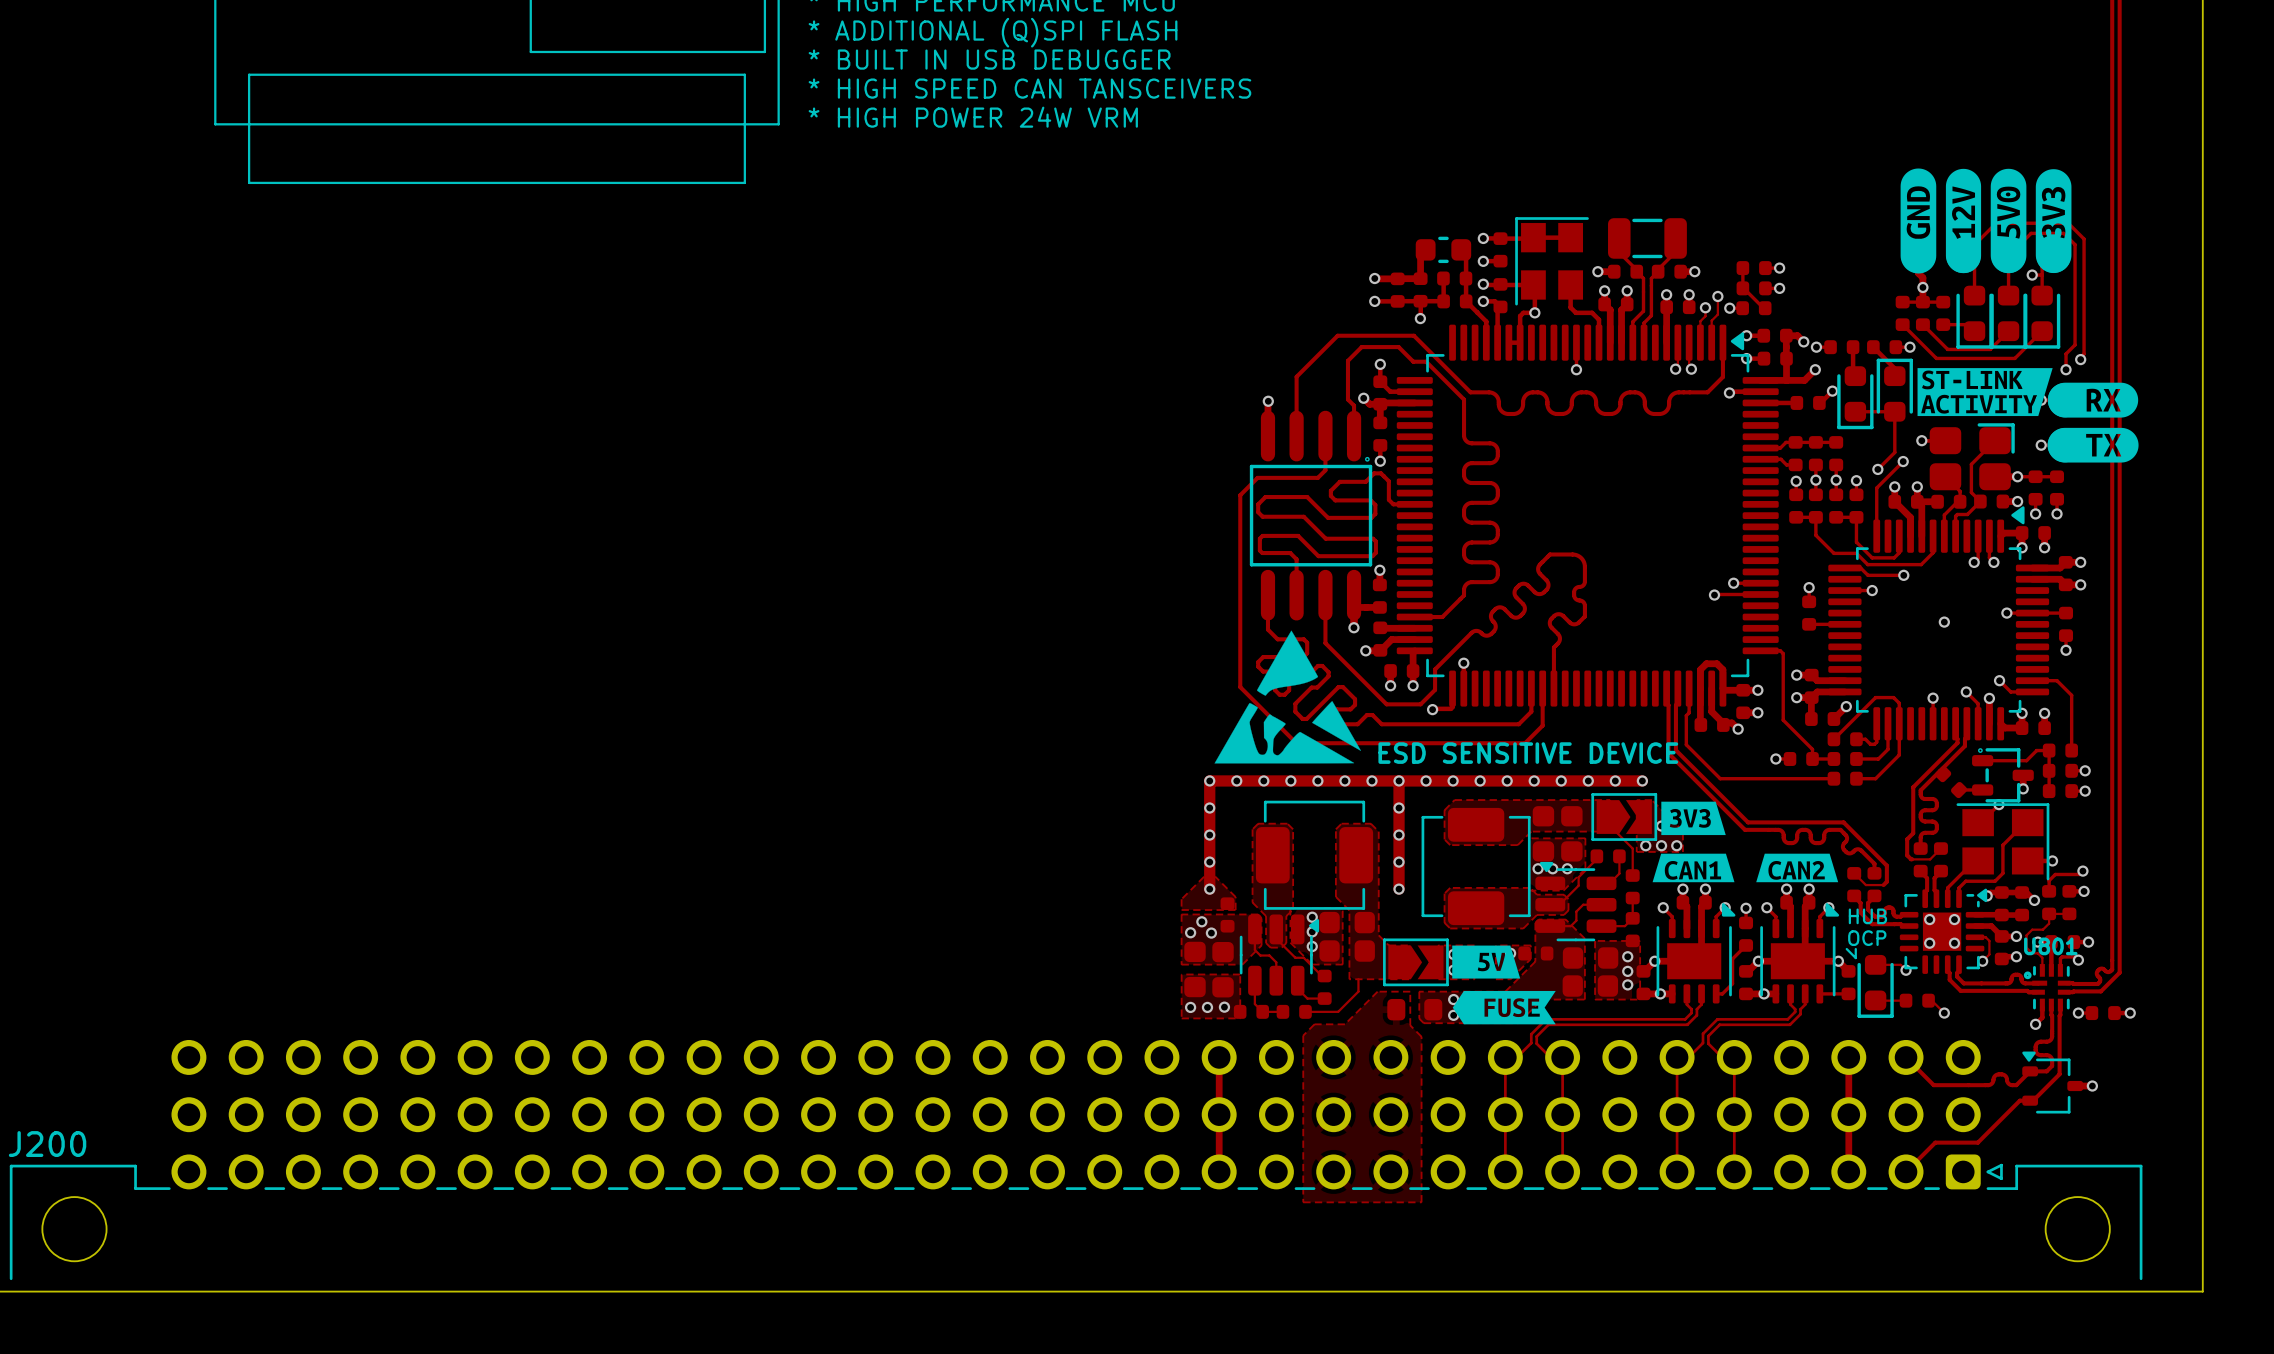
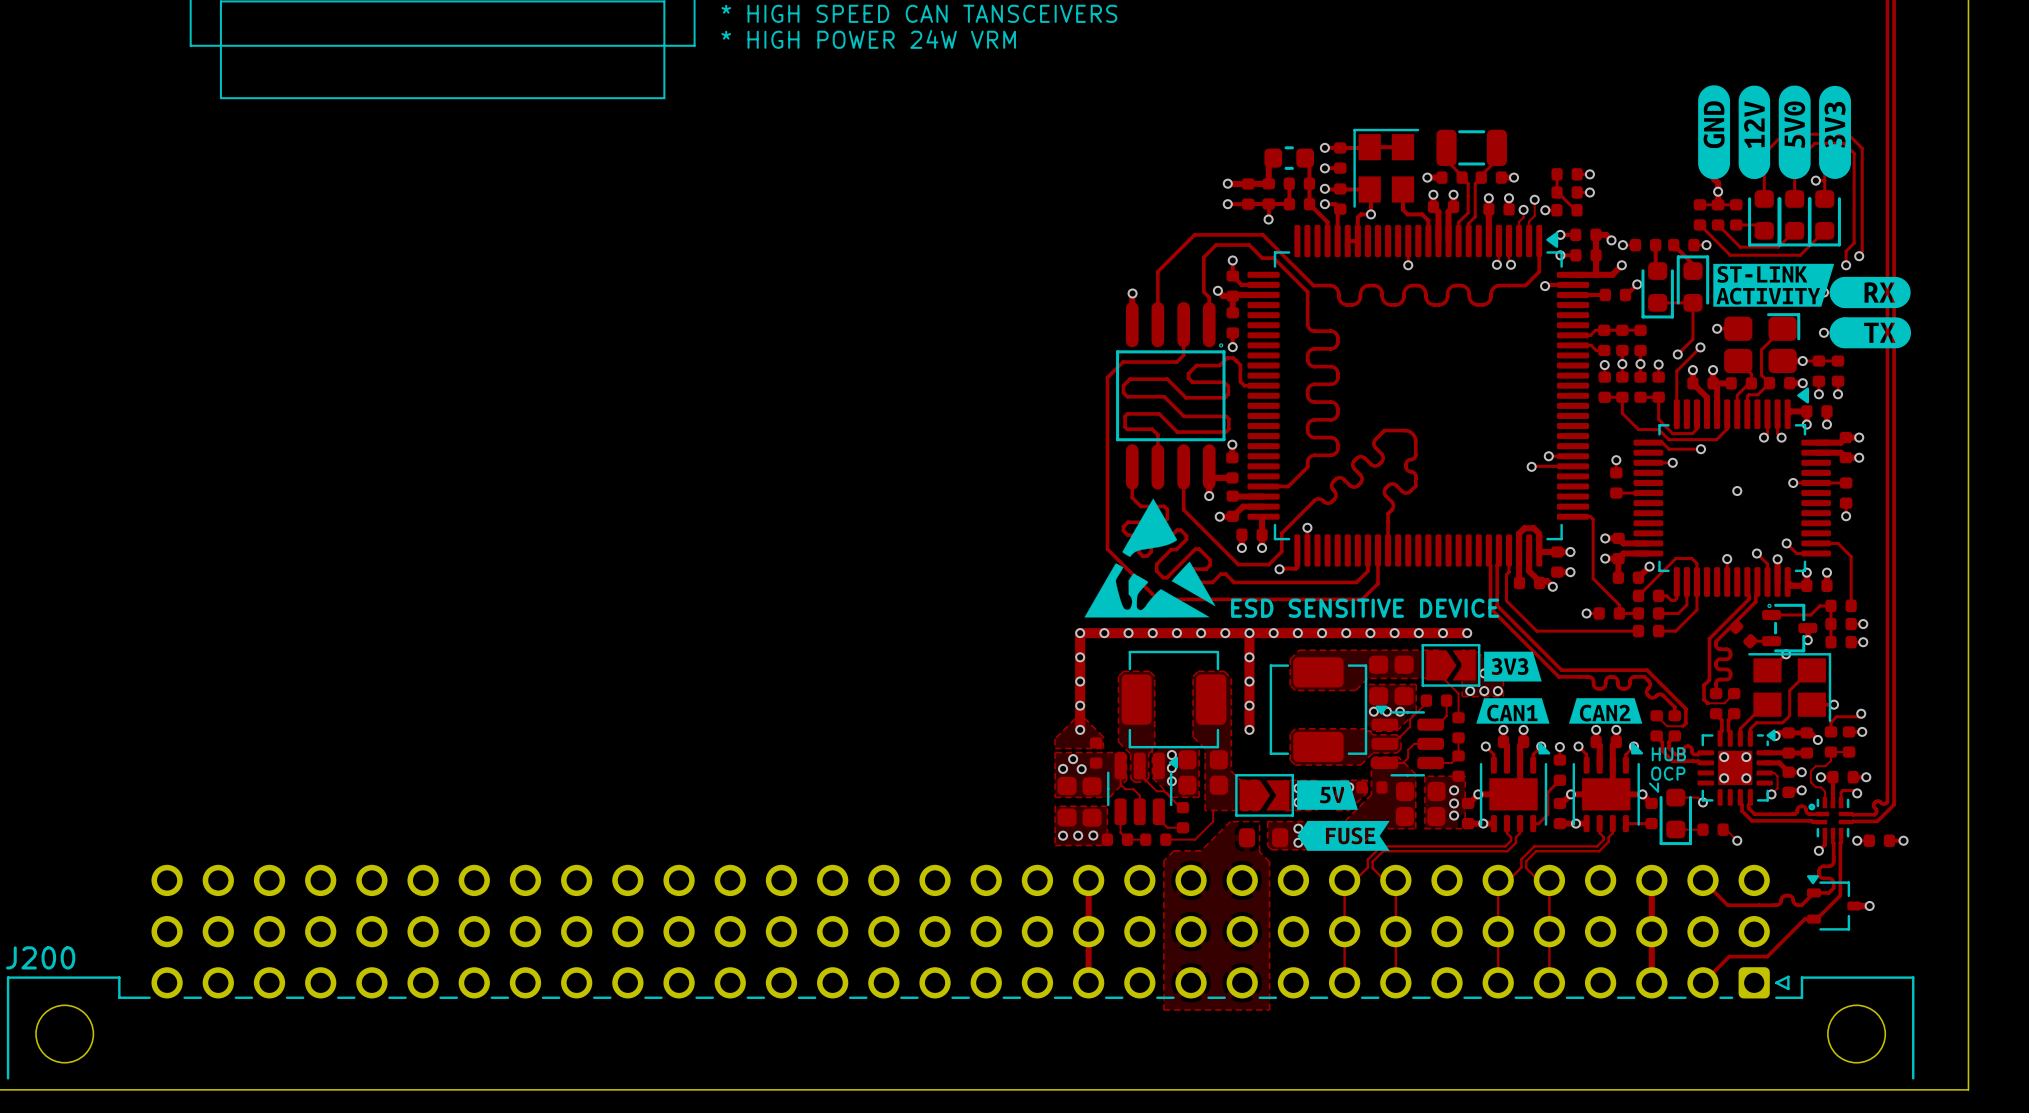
U801 name: U801 (2050, 946) -> none

